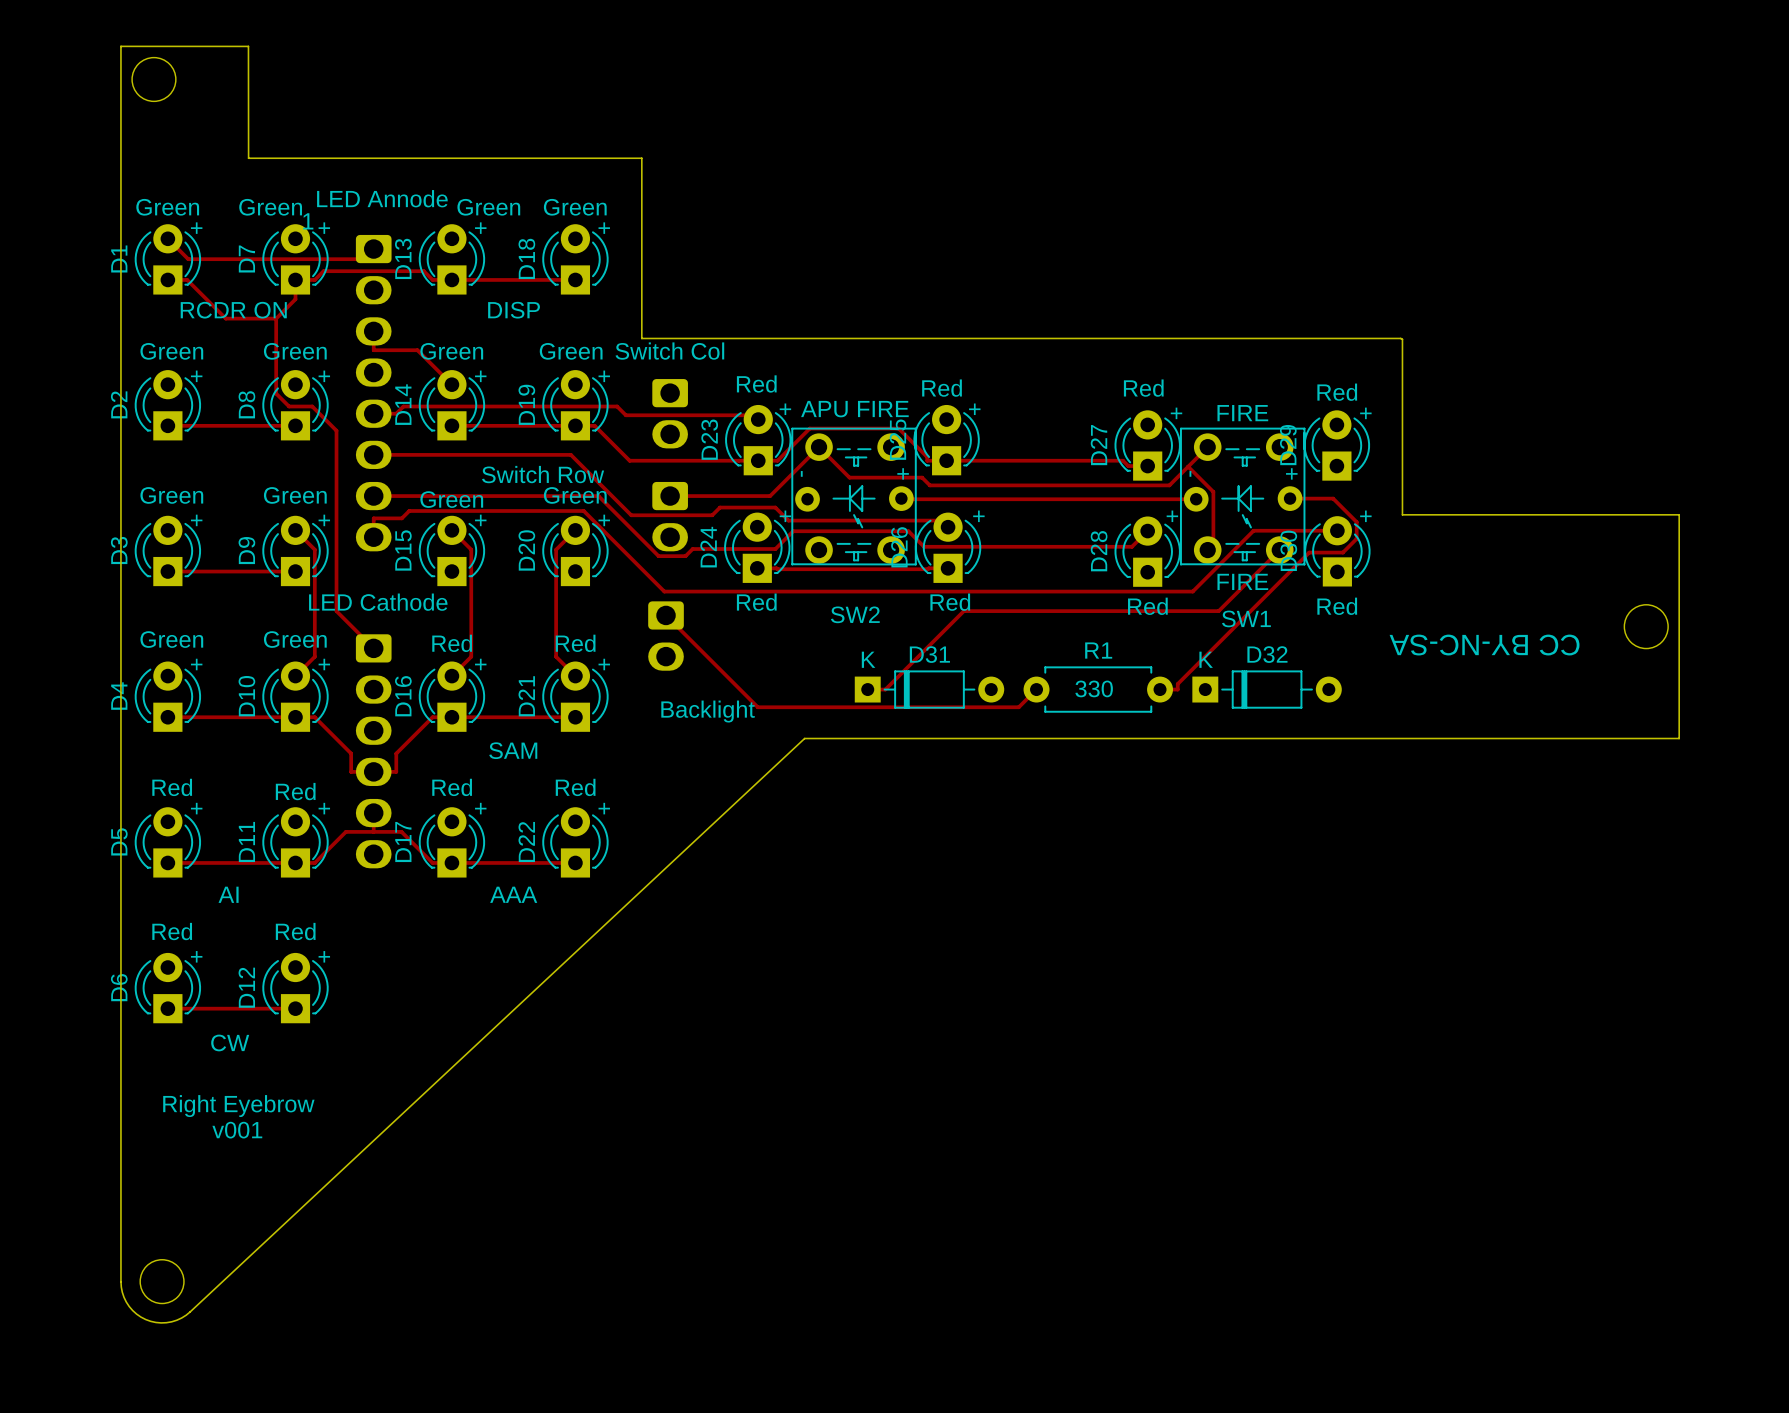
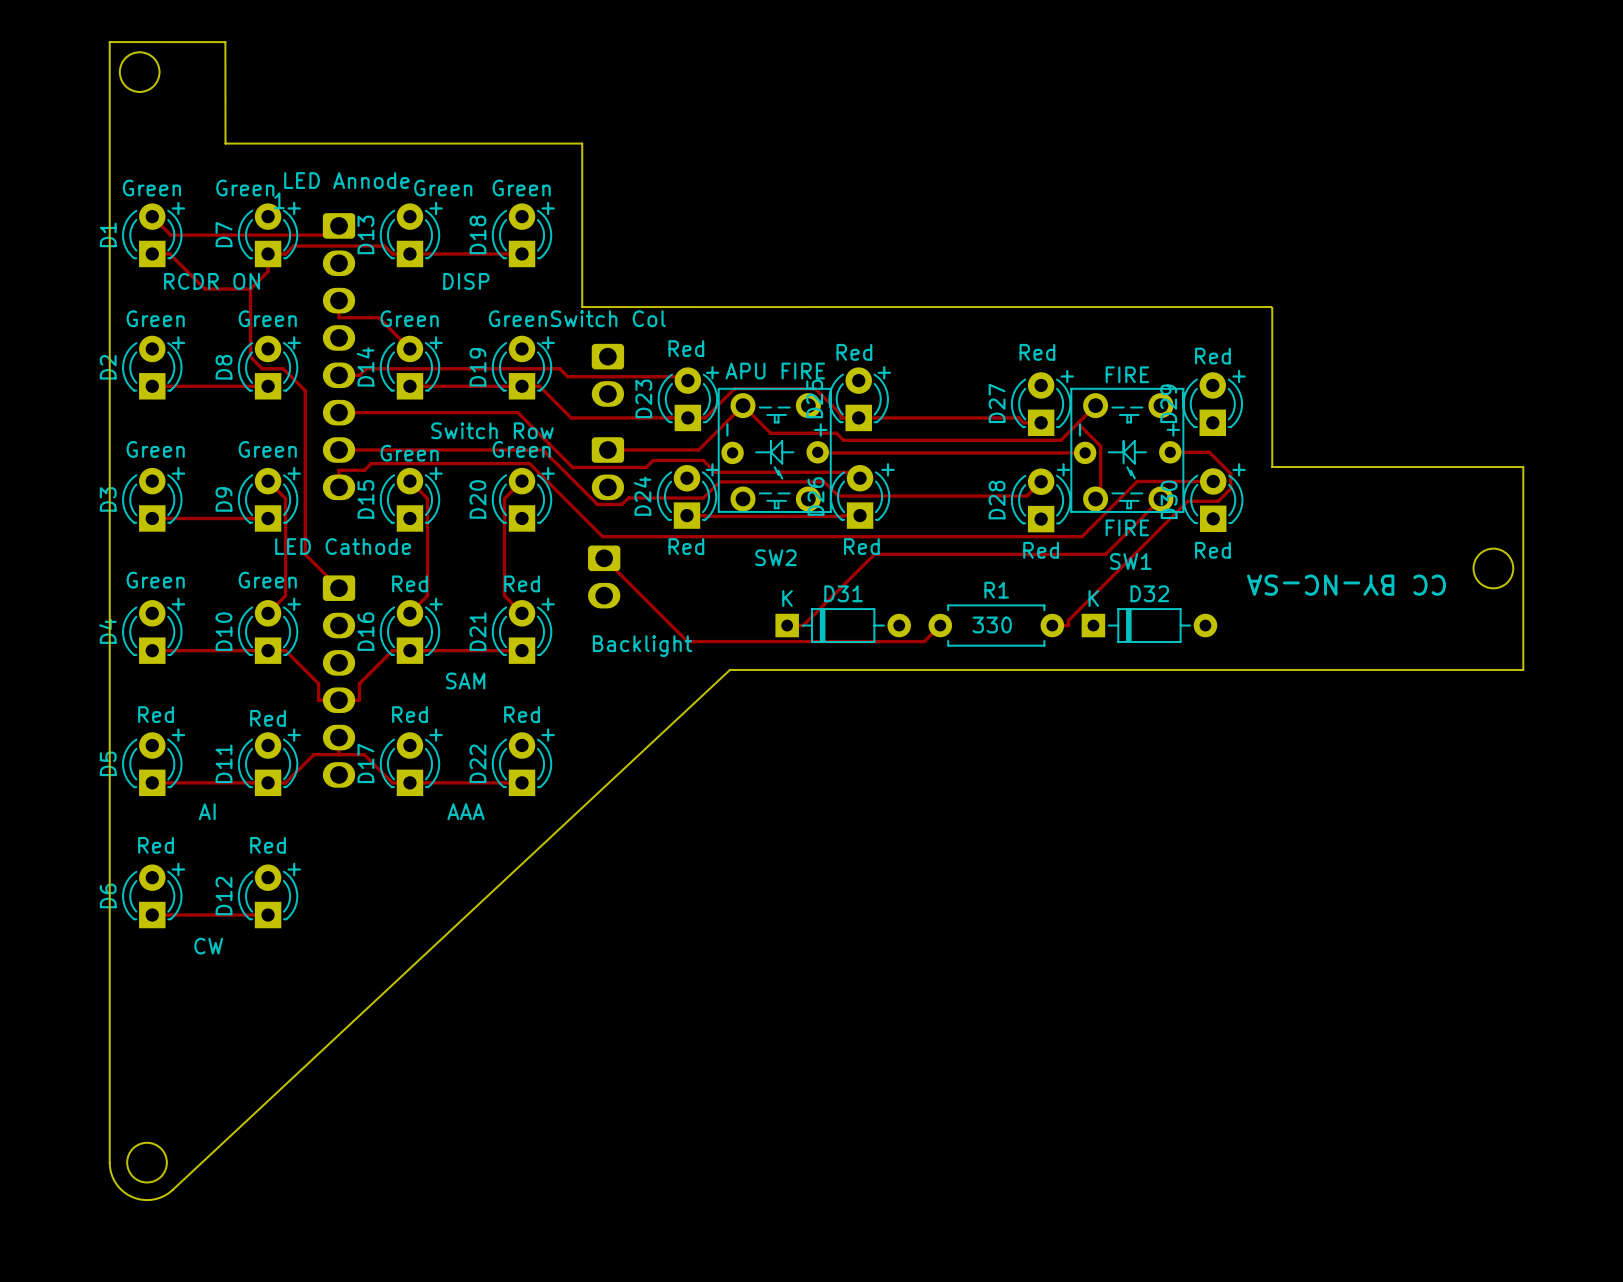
text: Right Eyebrow (238, 1106) -> none
text: v001 (237, 1130) -> none

